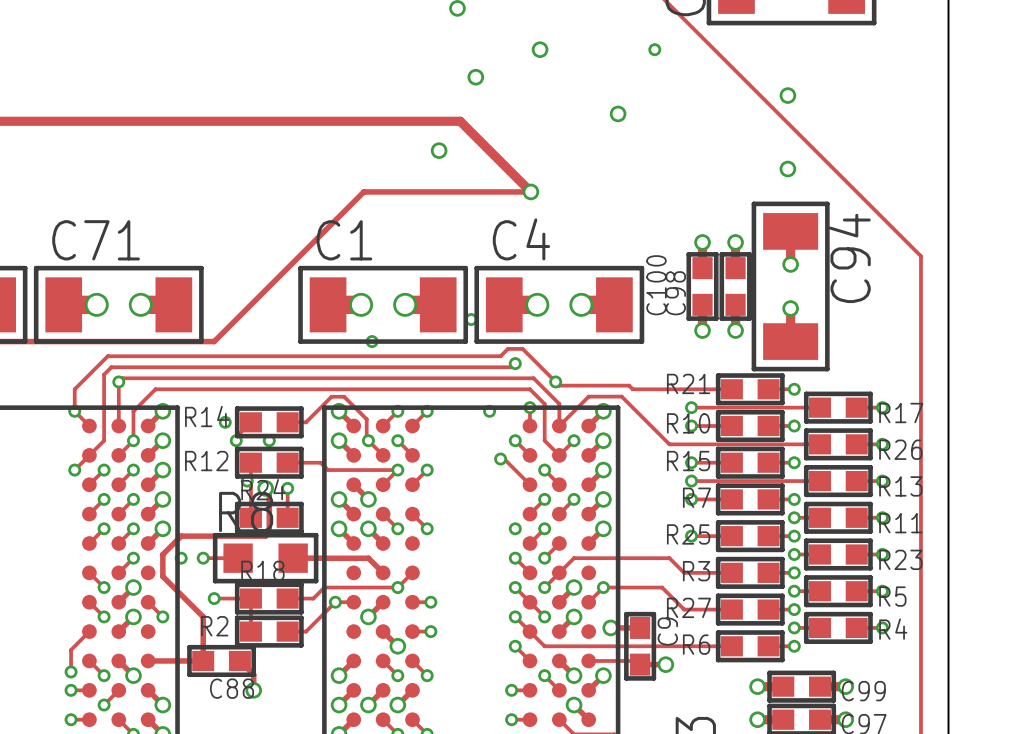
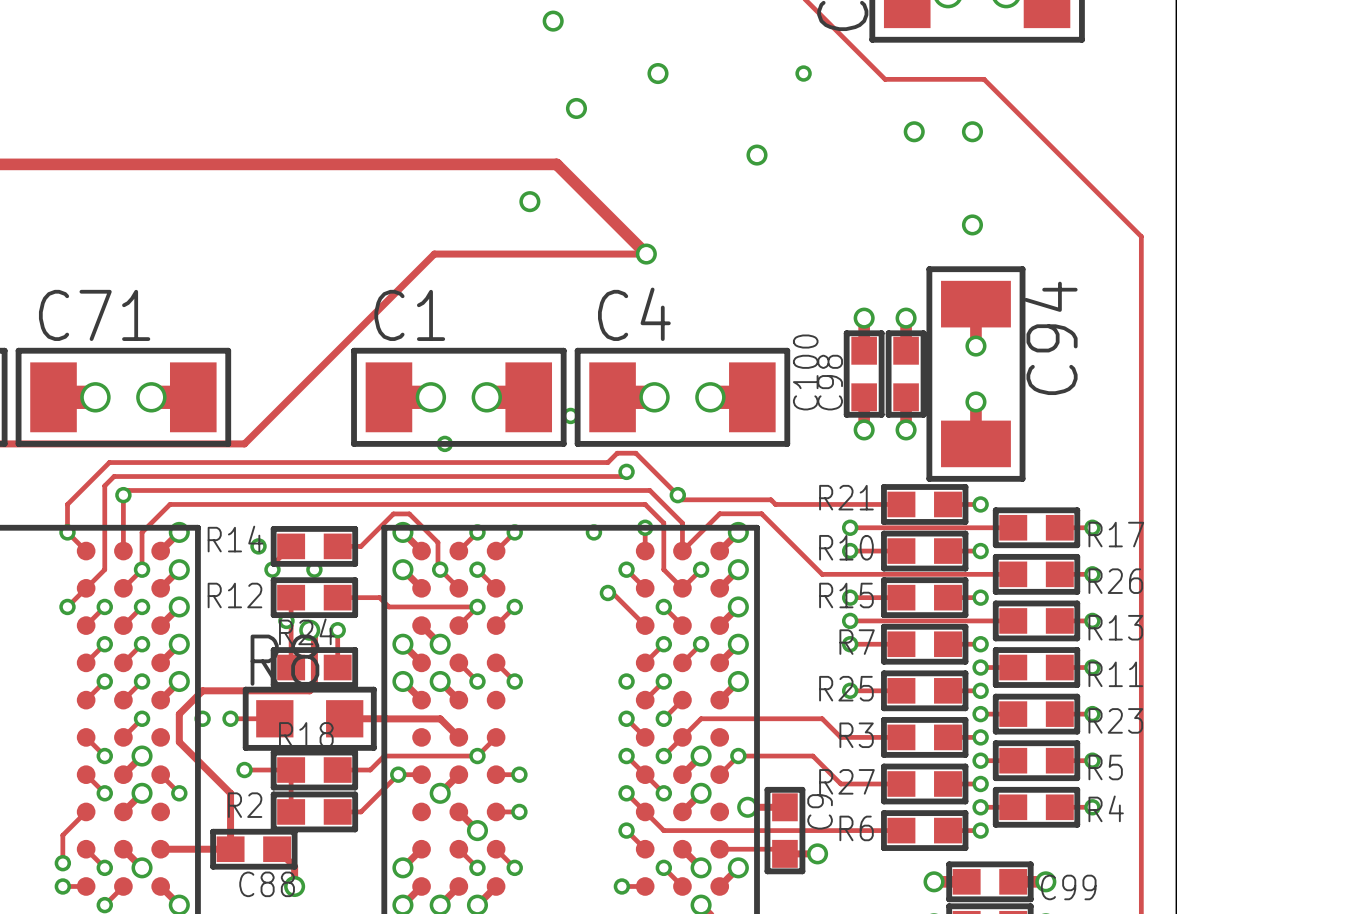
track: (719, 54) (920, 256) -> (885, 79) (984, 79) (1141, 236) (1141, 335)
via: none -> (914, 131)

